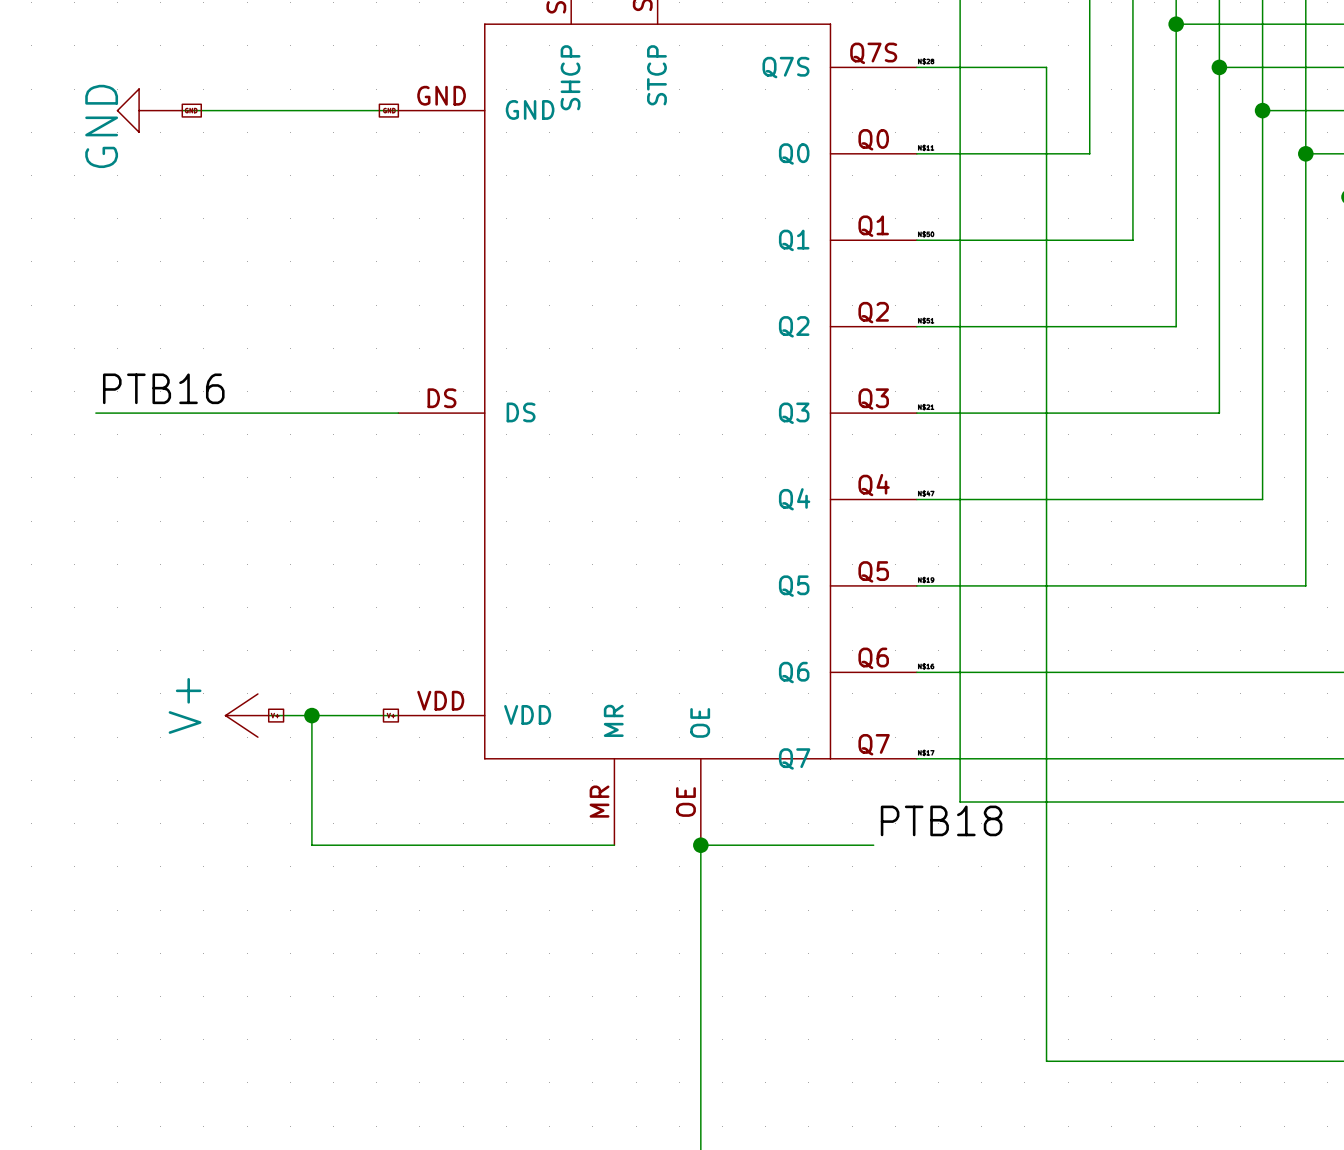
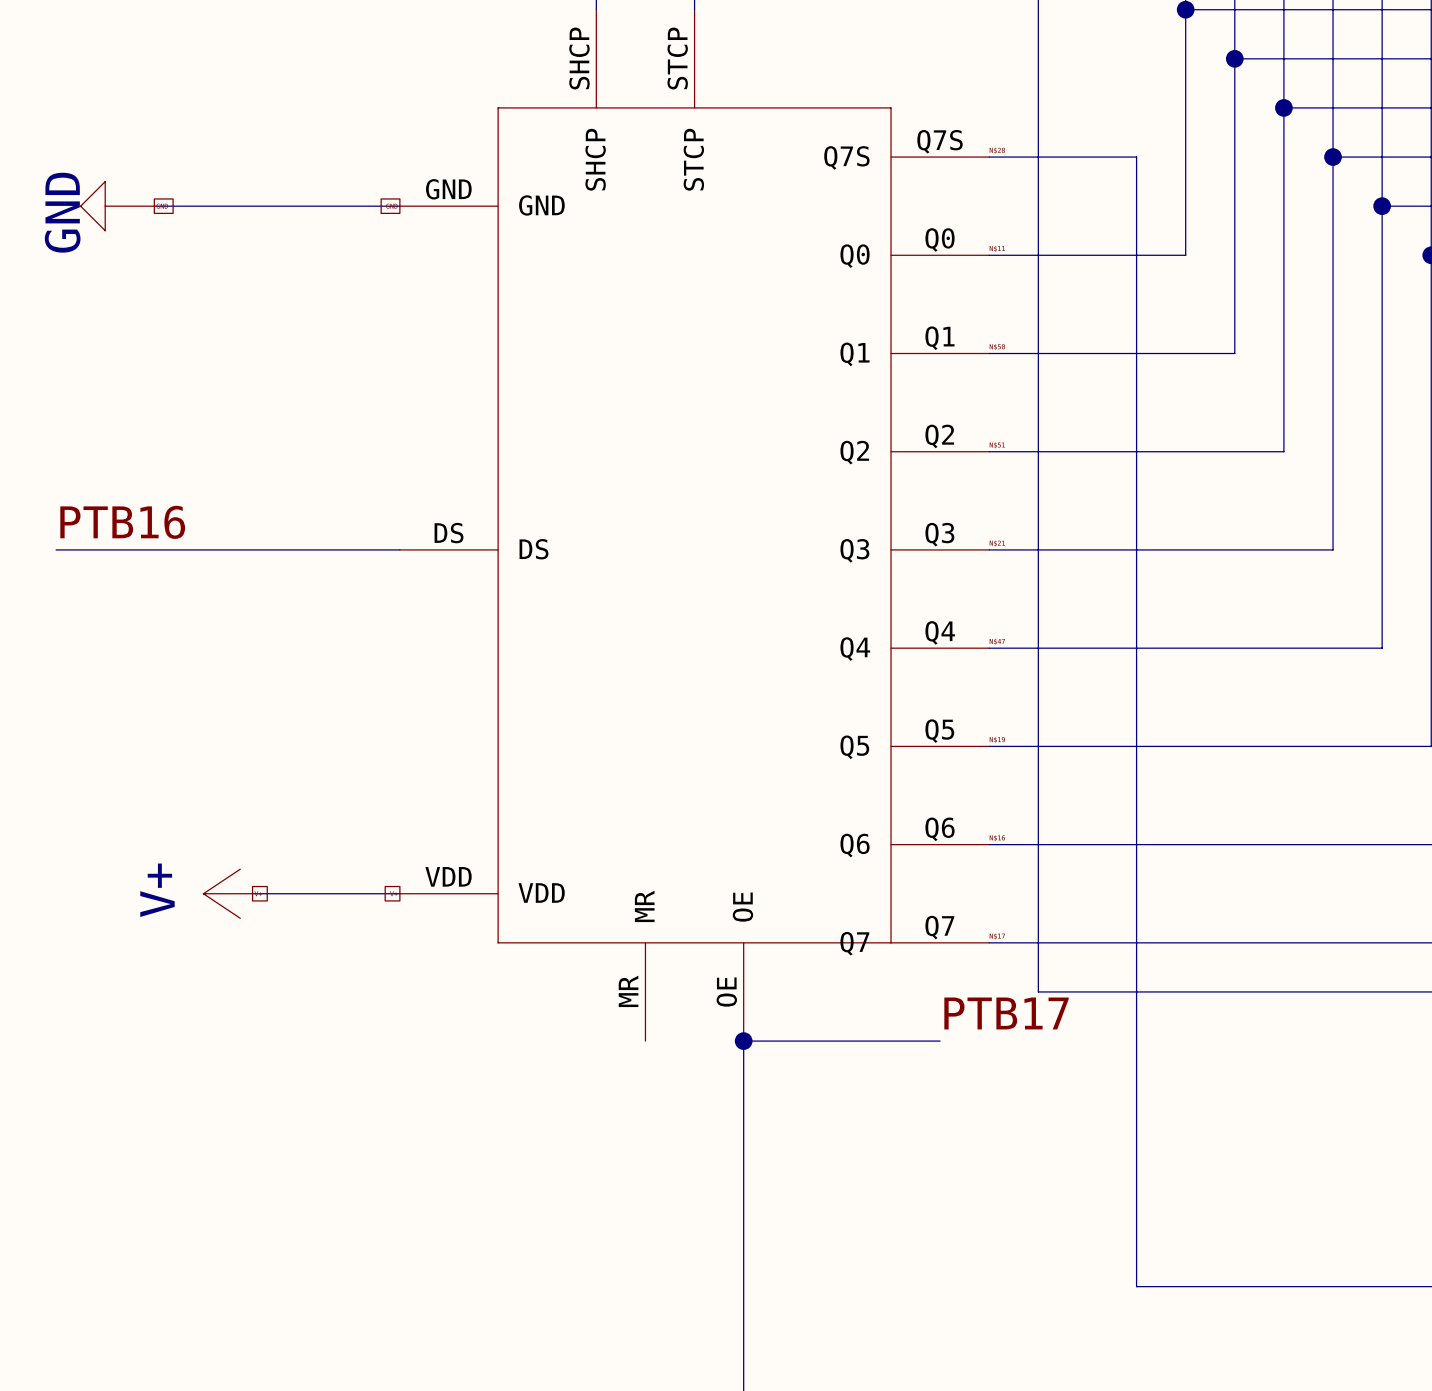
wire: (311, 715) (311, 845) (614, 845) -> none
junction: (311, 715) -> none
label: PTB18 (941, 820) -> PTB17 (1006, 1013)

